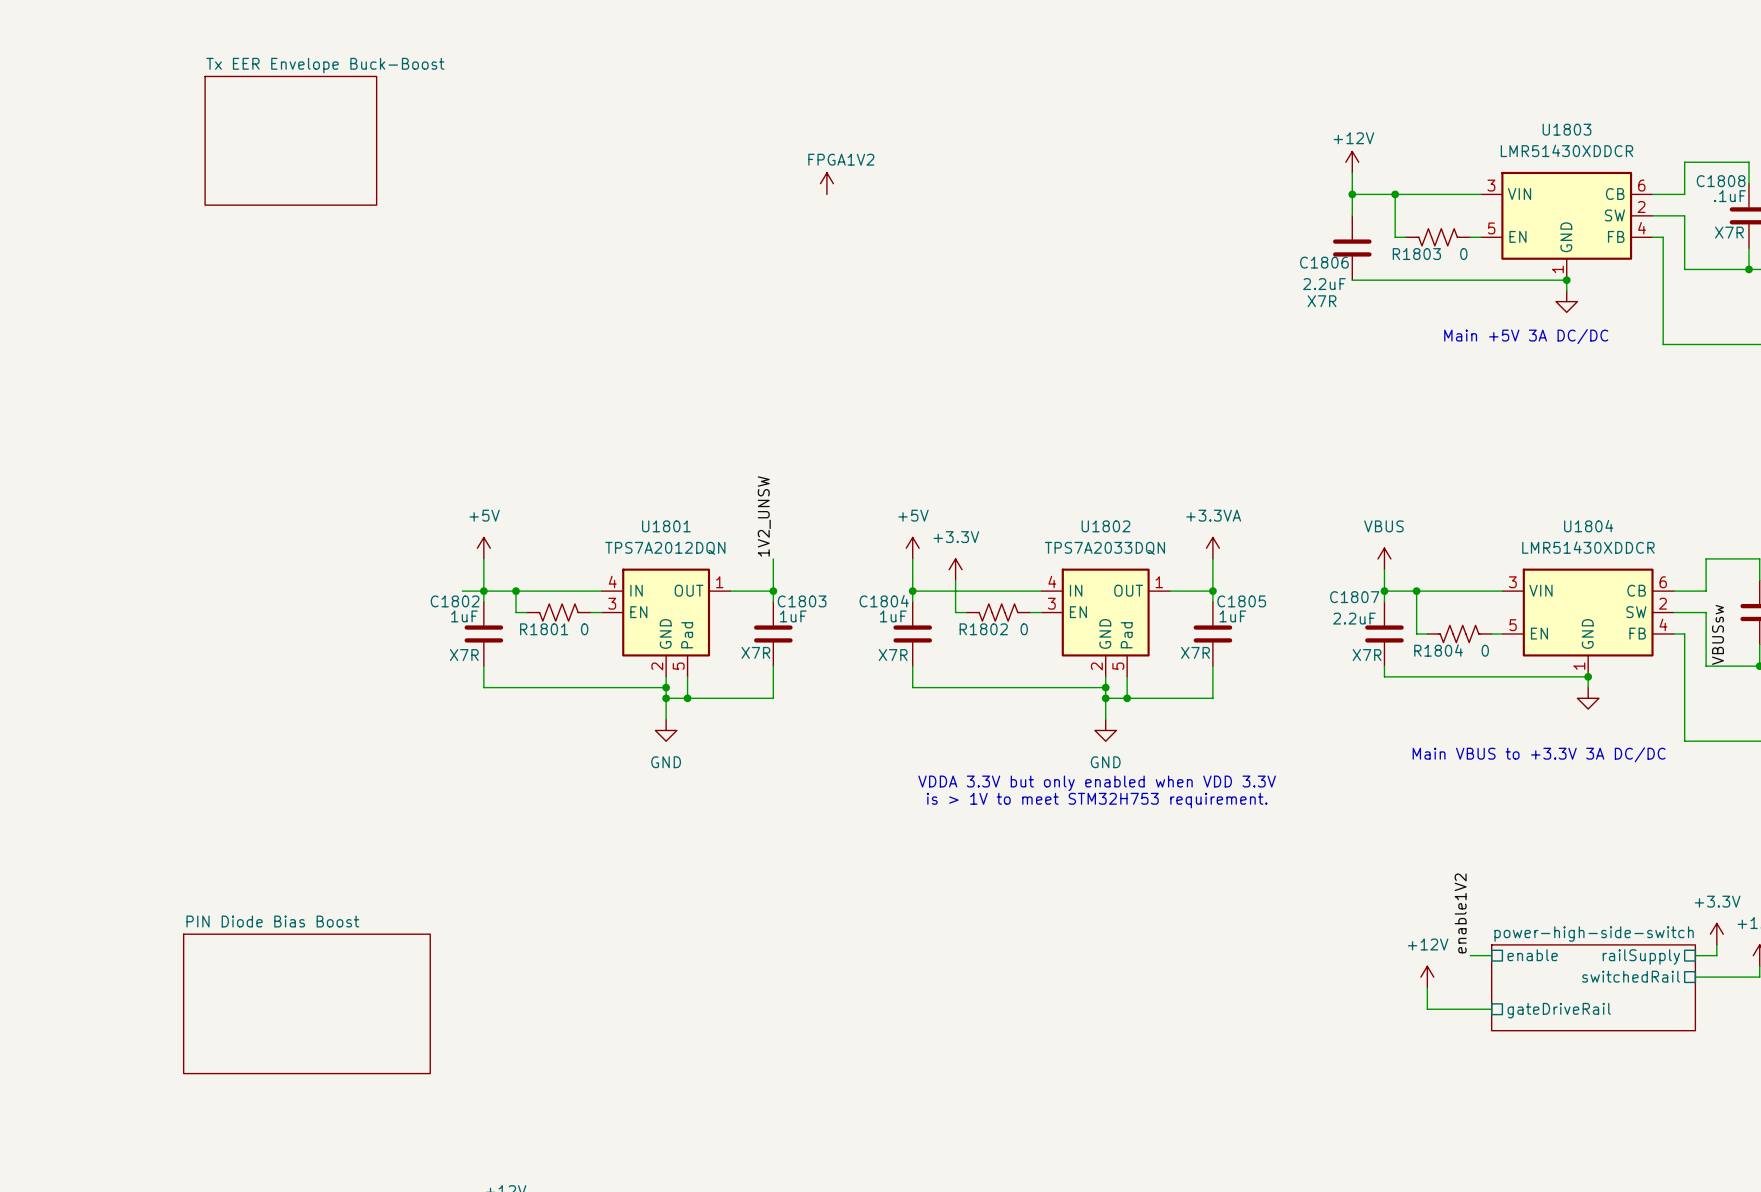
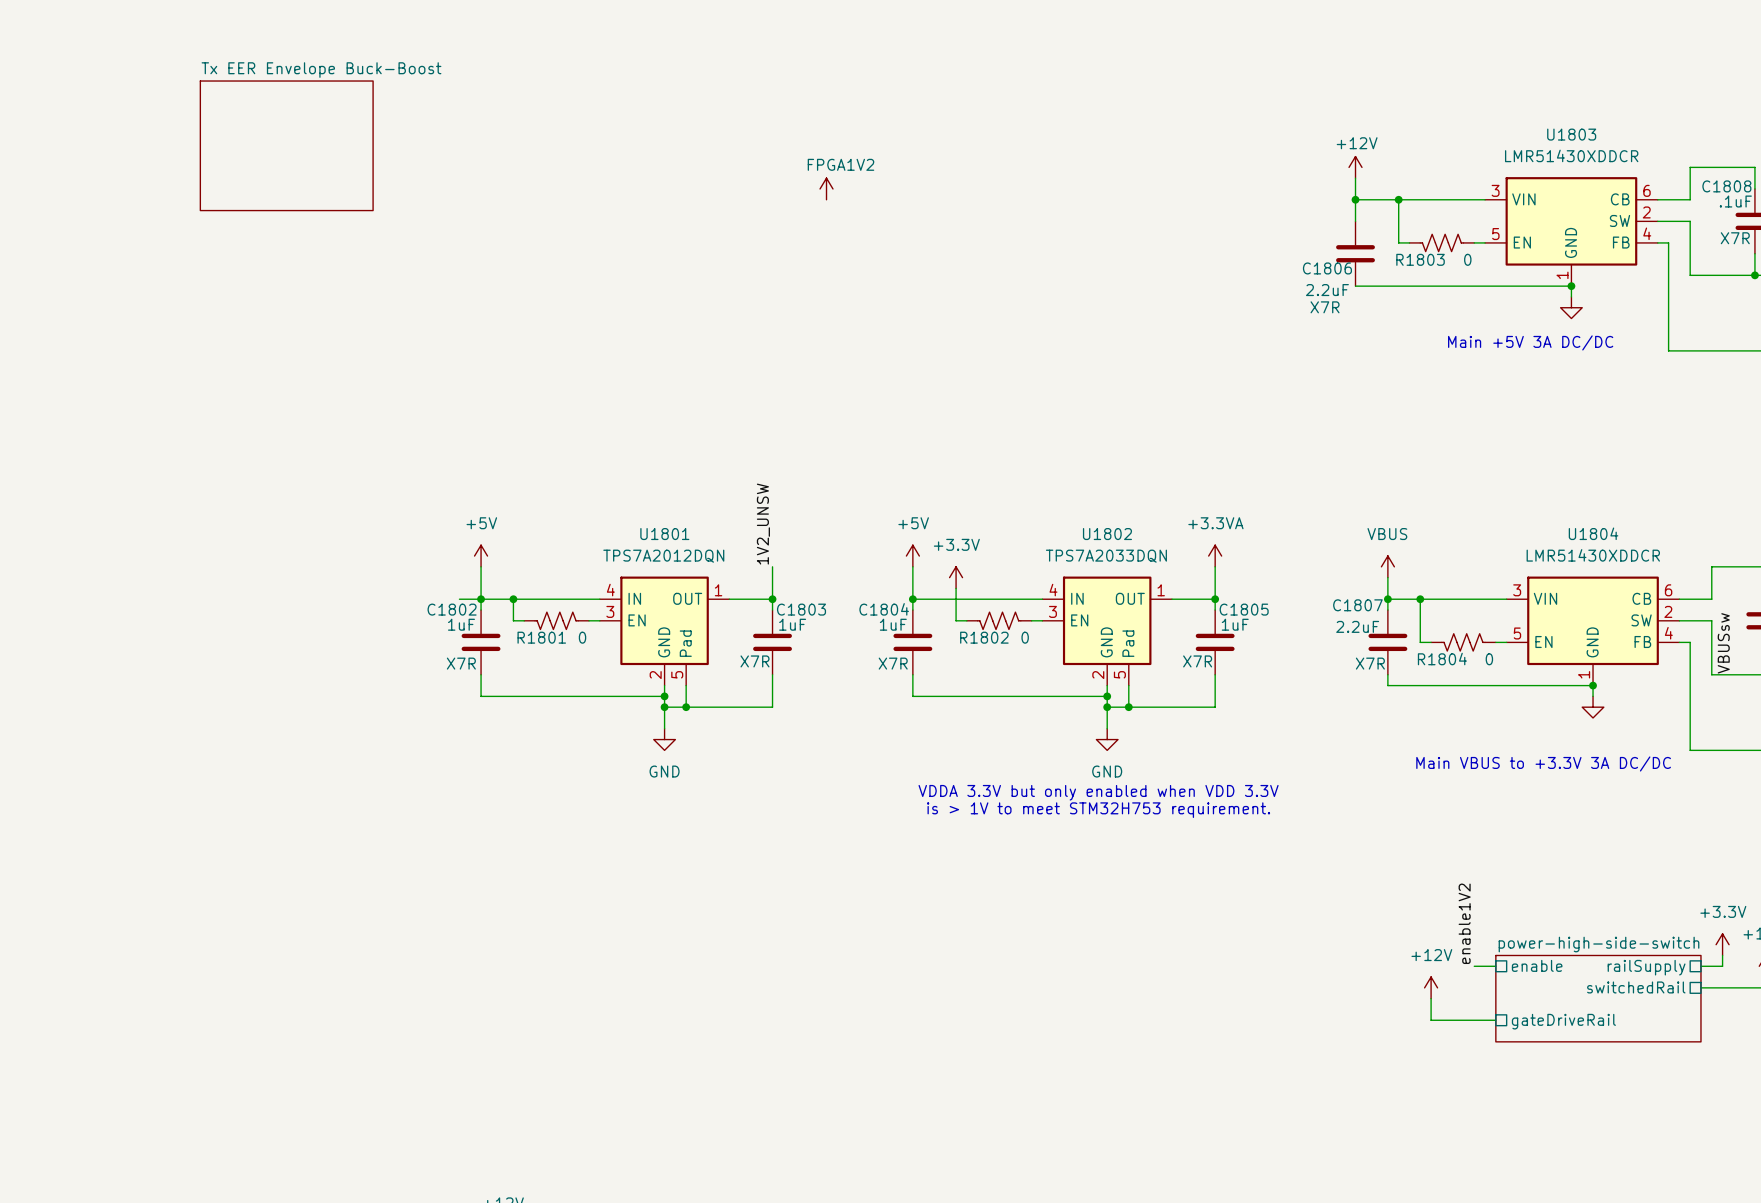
sheet PIN Diode Bias Boost: (306, 1003) -> none

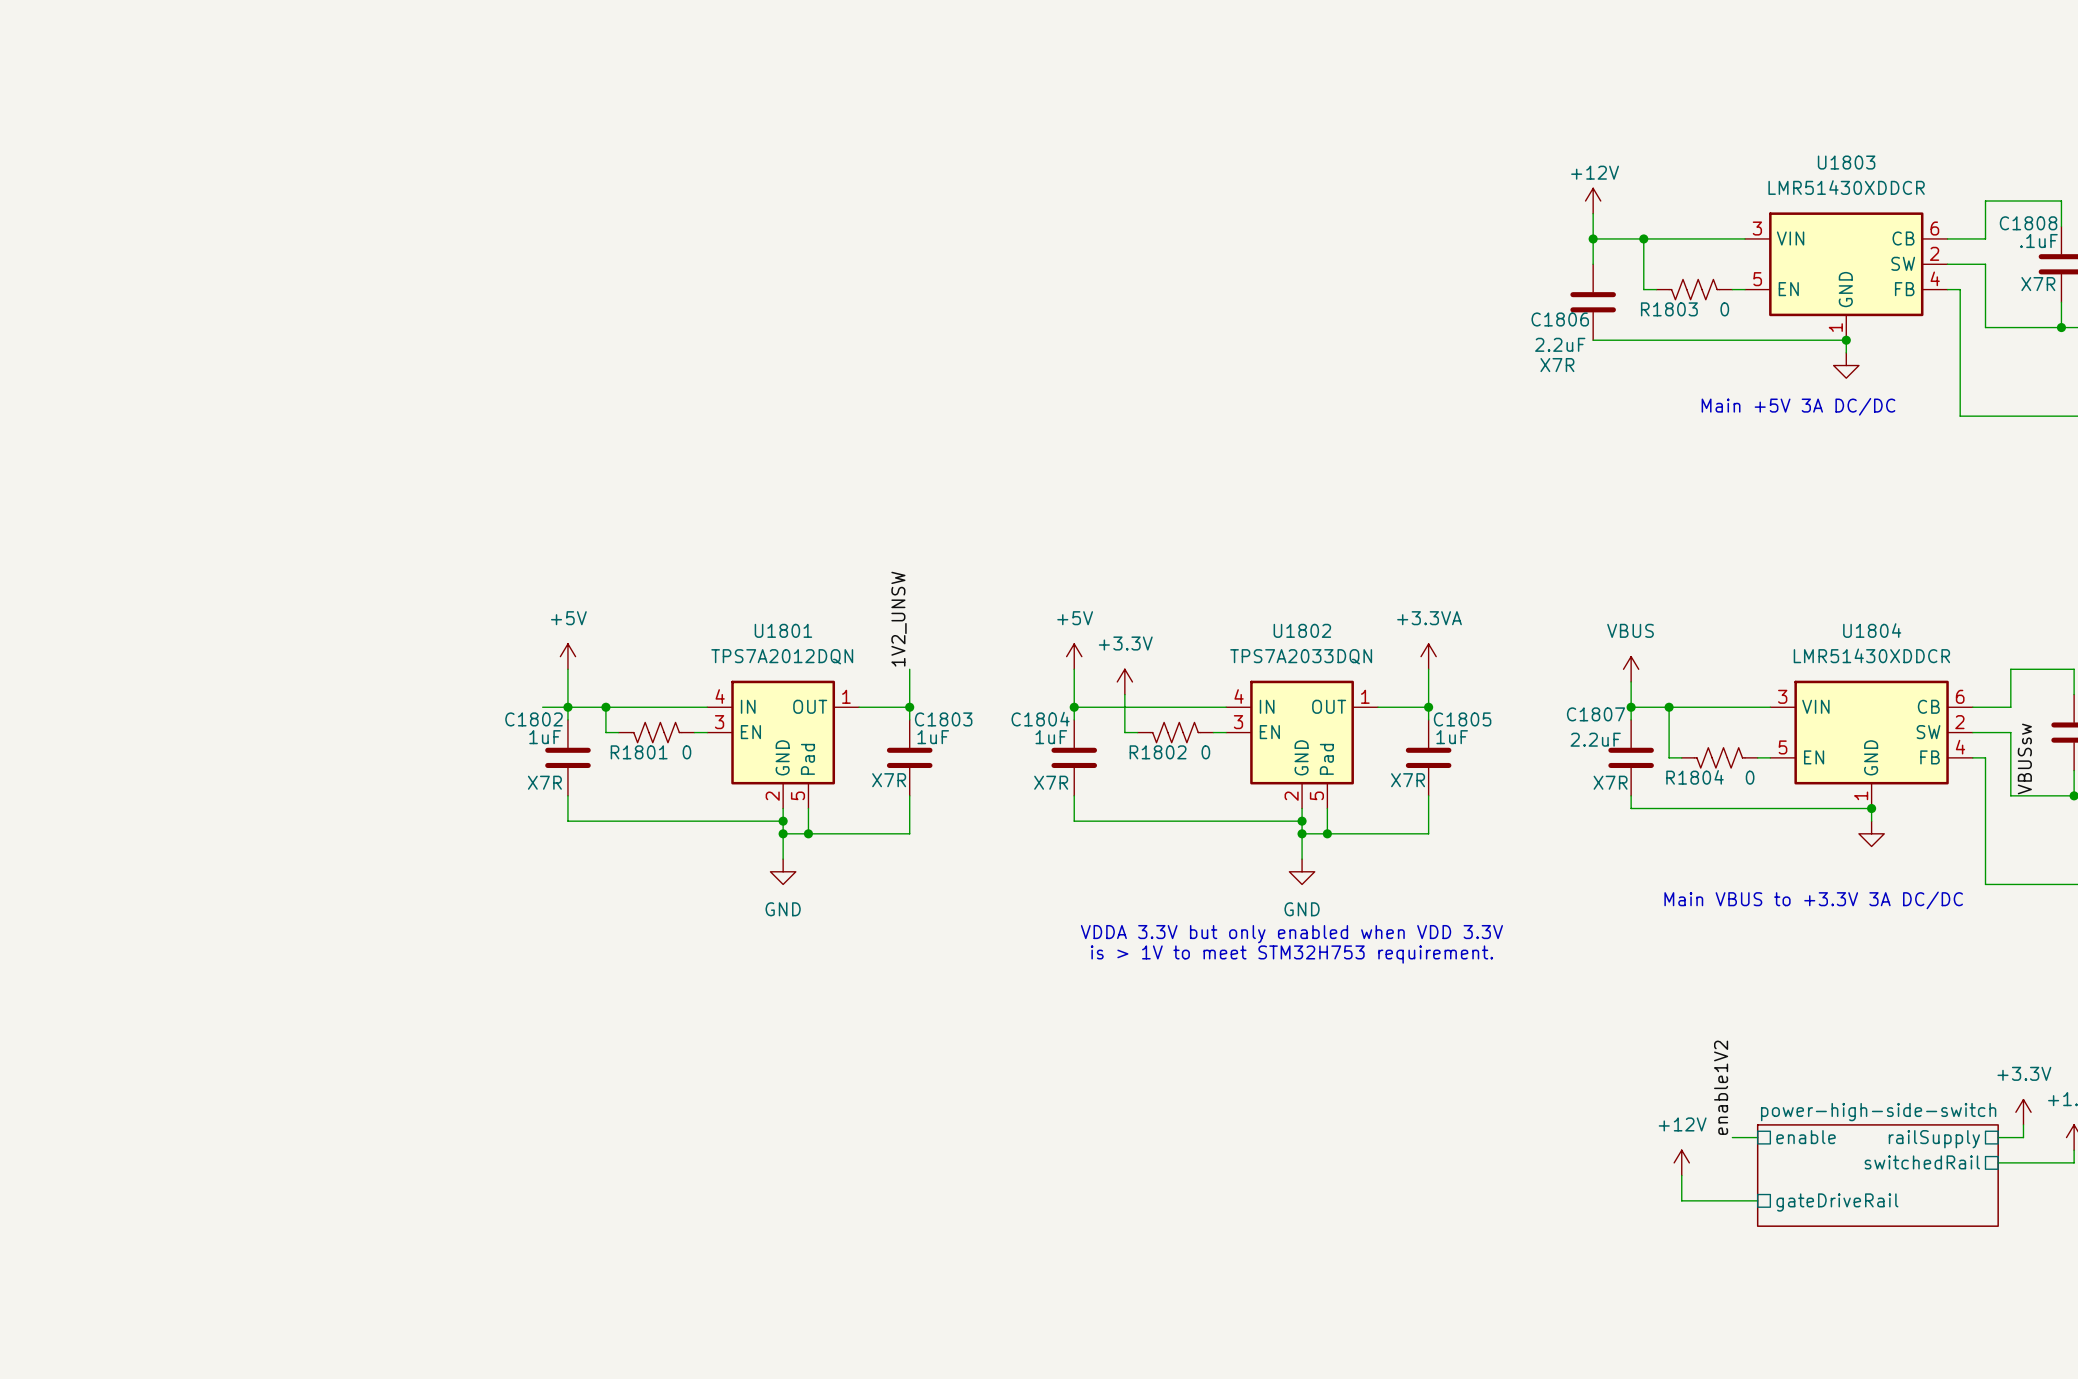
sheet Tx EER Envelope Buck-Boost: (286, 145) -> none
power symbol: FPGA1V2 (826, 188) -> none

